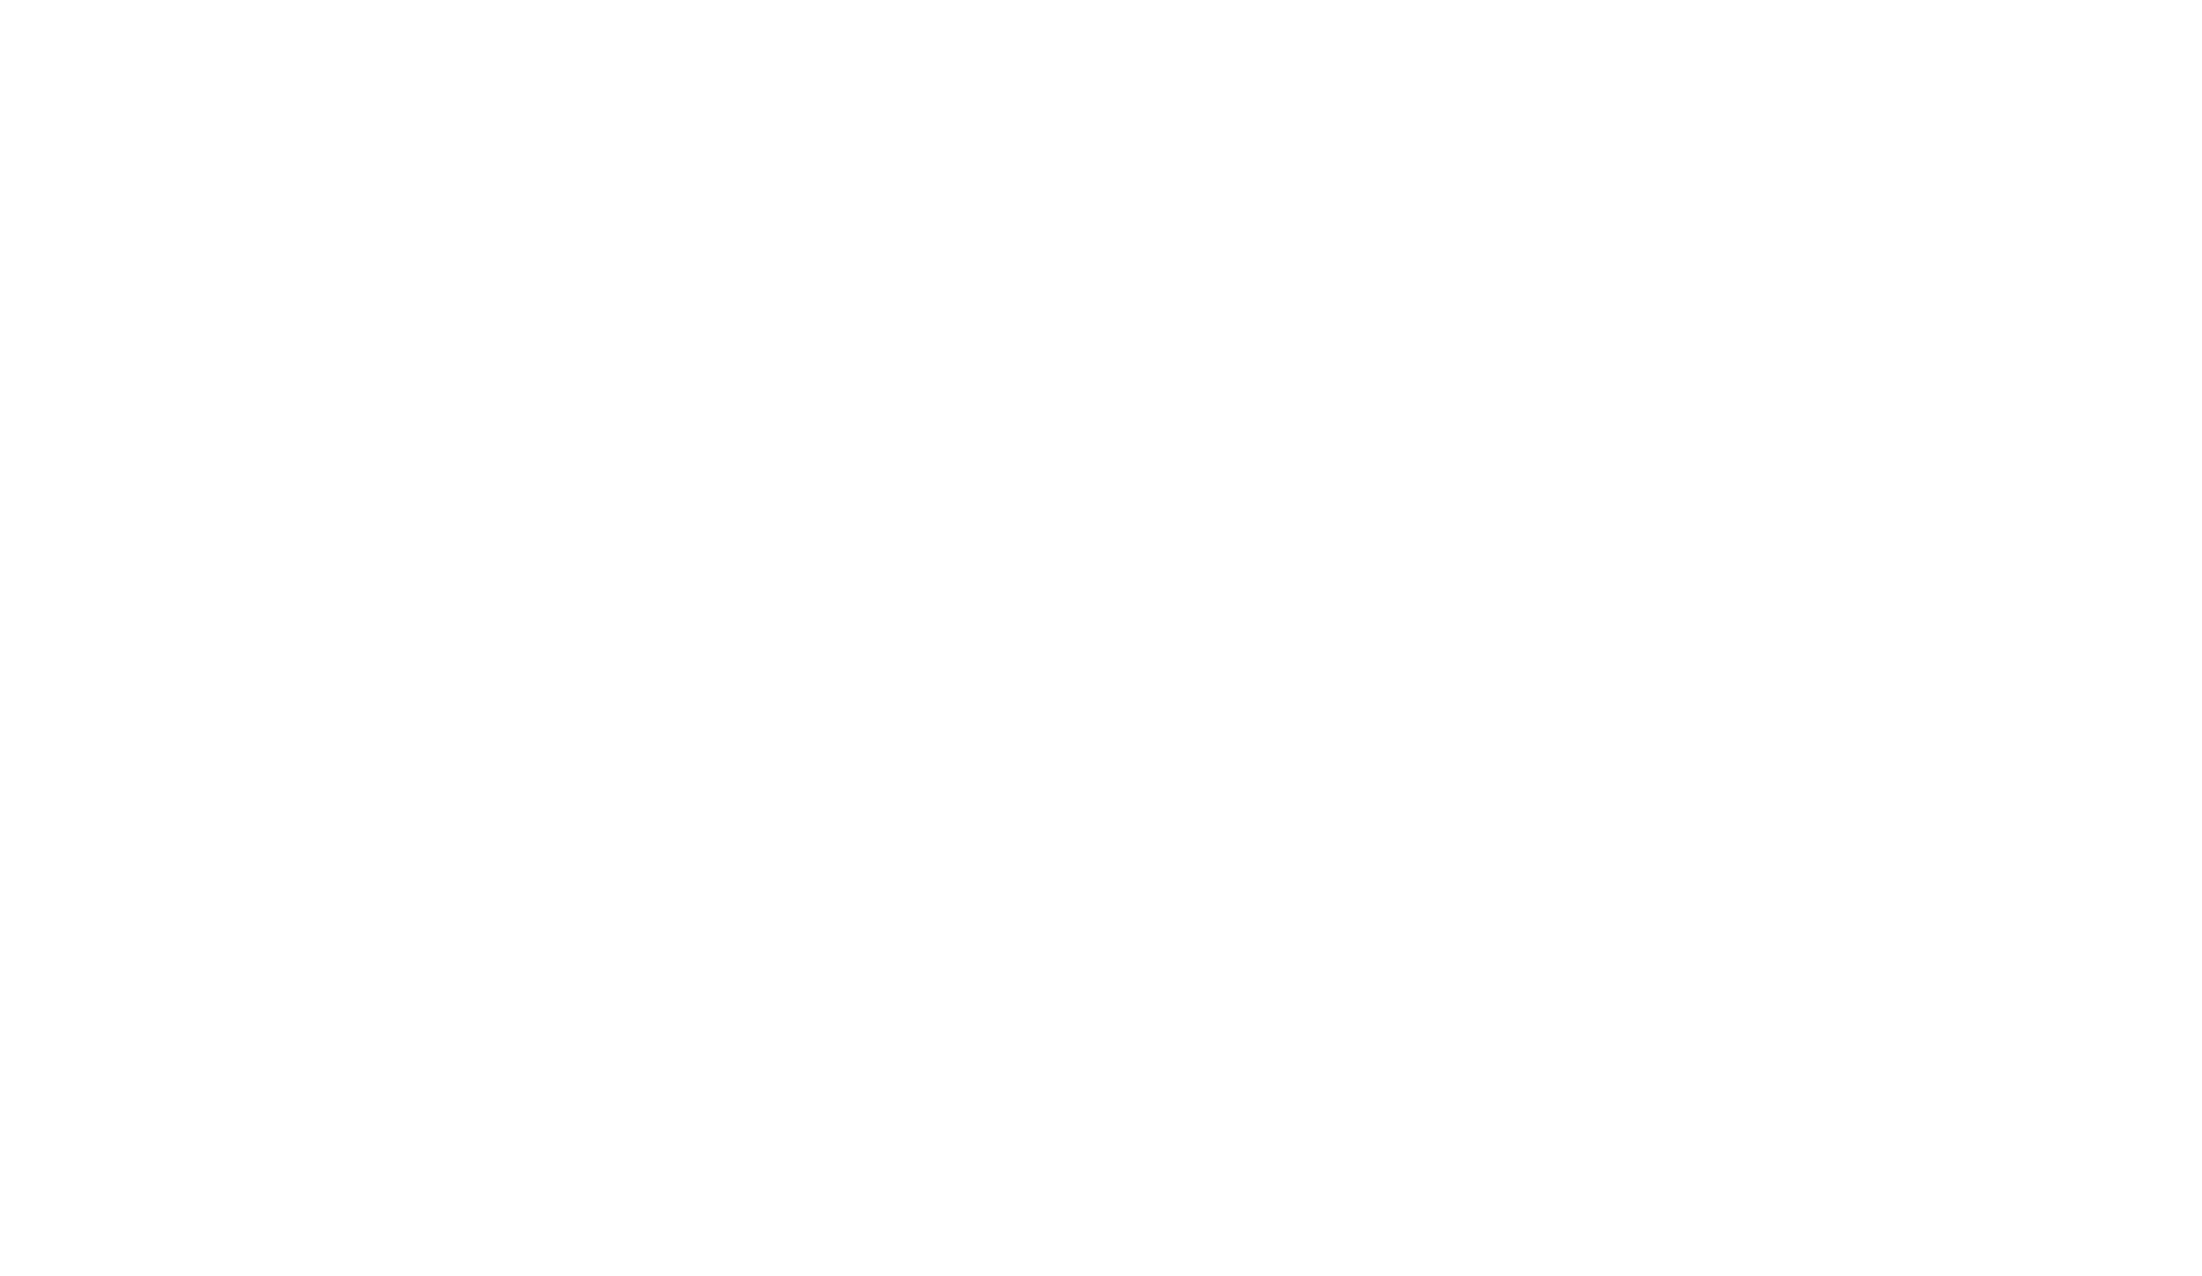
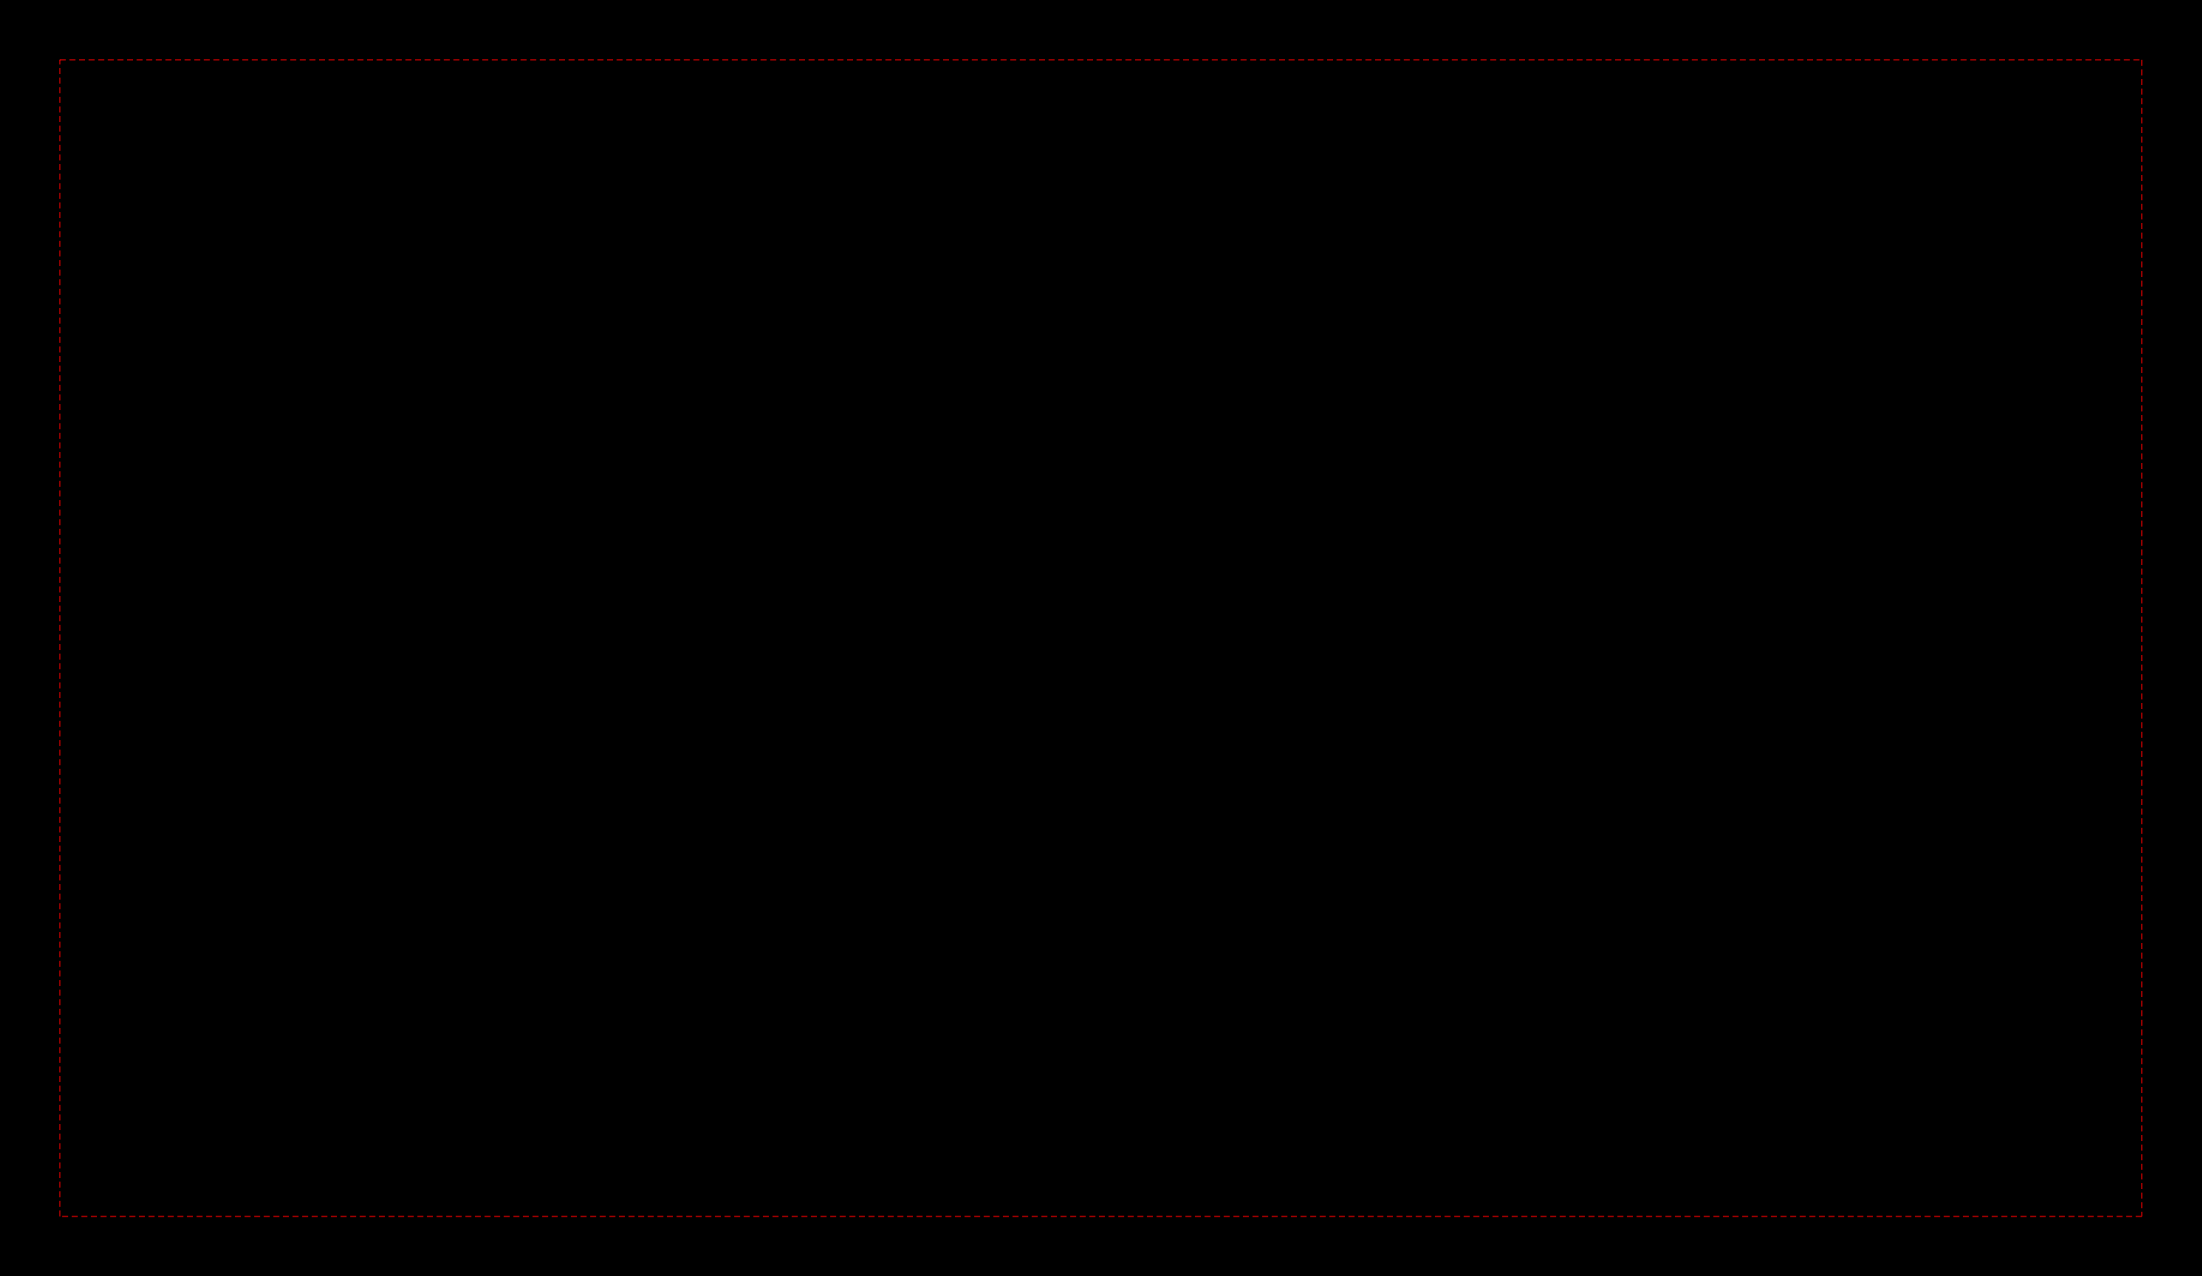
top zone outline: none -> (59, 59) (59, 1216) (2141, 1216) (2141, 59) (59, 59)

